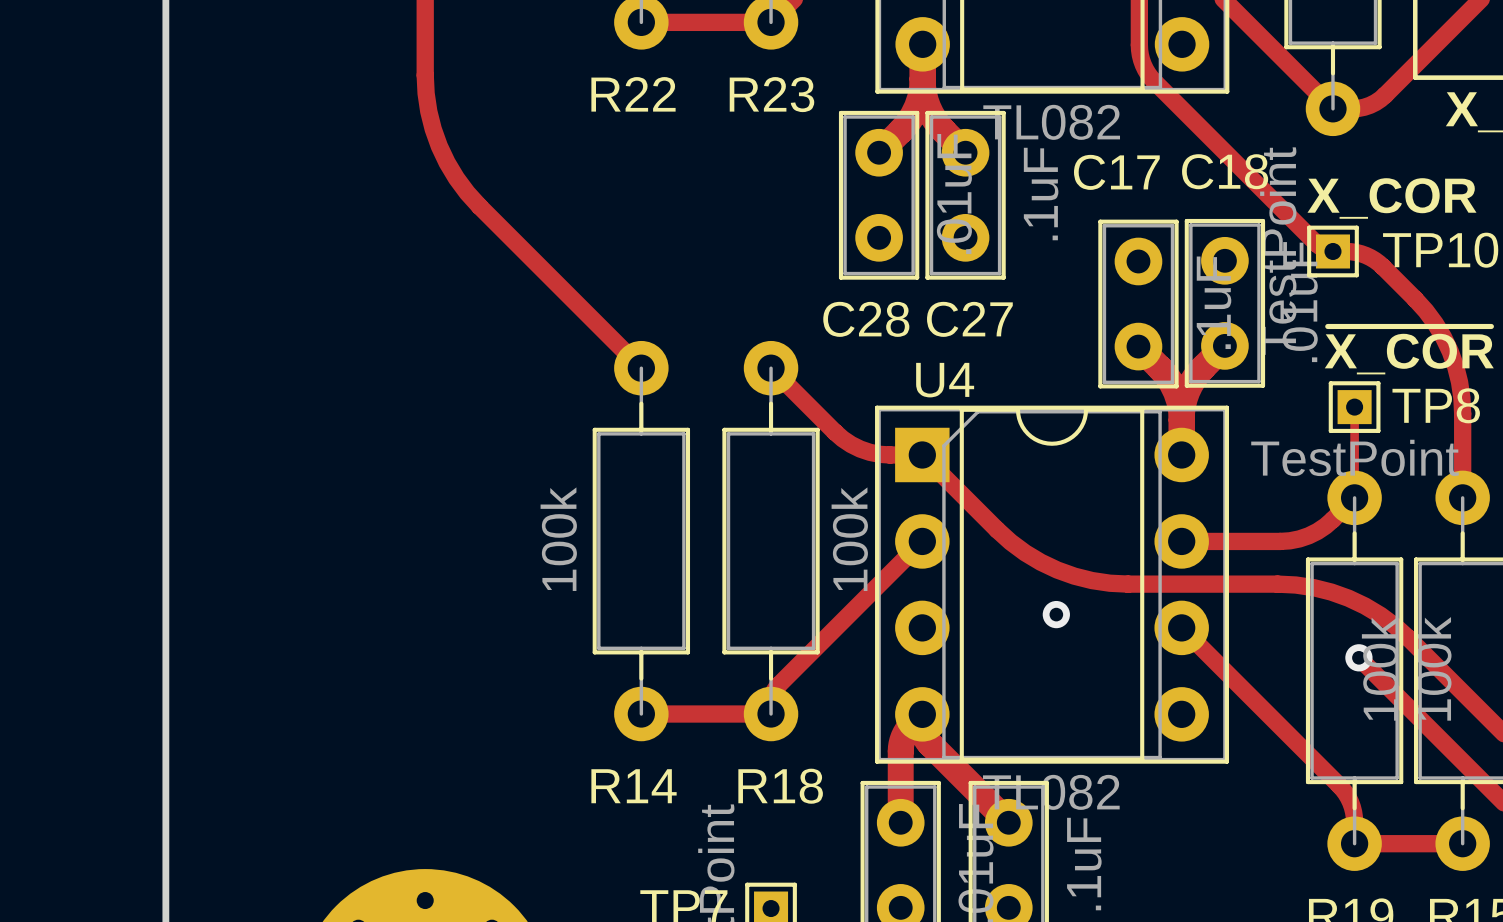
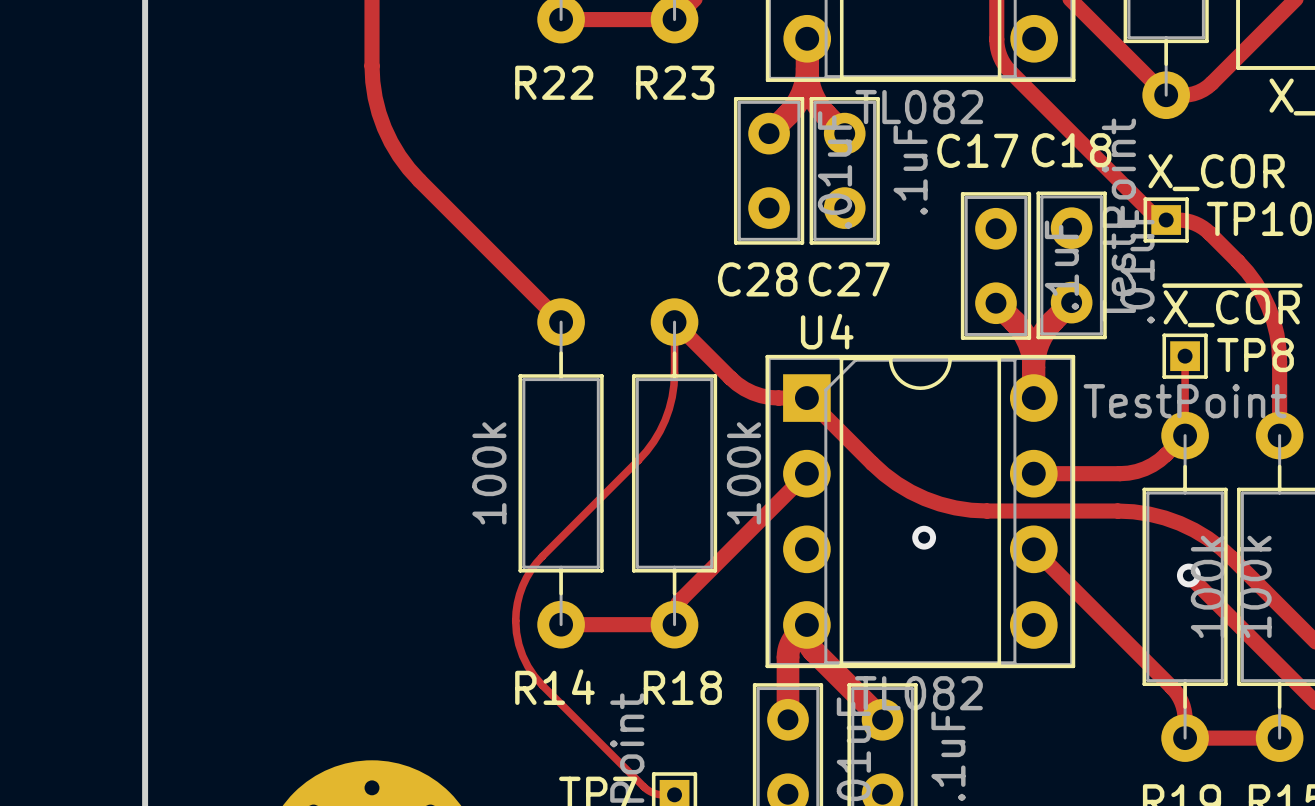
track: none -> (674, 322) (673, 385) (669, 408) (659, 431) (638, 460) (536, 562) (526, 577) (519, 594) (515, 620) (516, 632) (522, 655) (534, 676) (542, 685) (645, 788) (657, 794) (674, 794)

